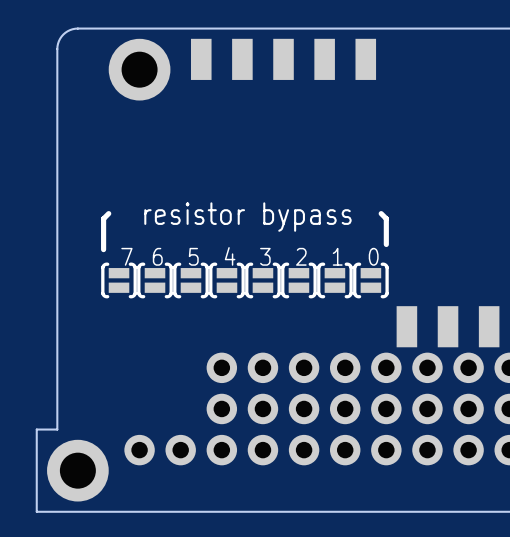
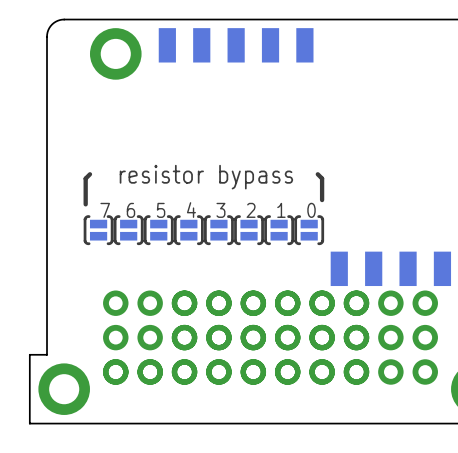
part: none -> (236, 303)
part: none -> (236, 337)
part: none -> (236, 371)

